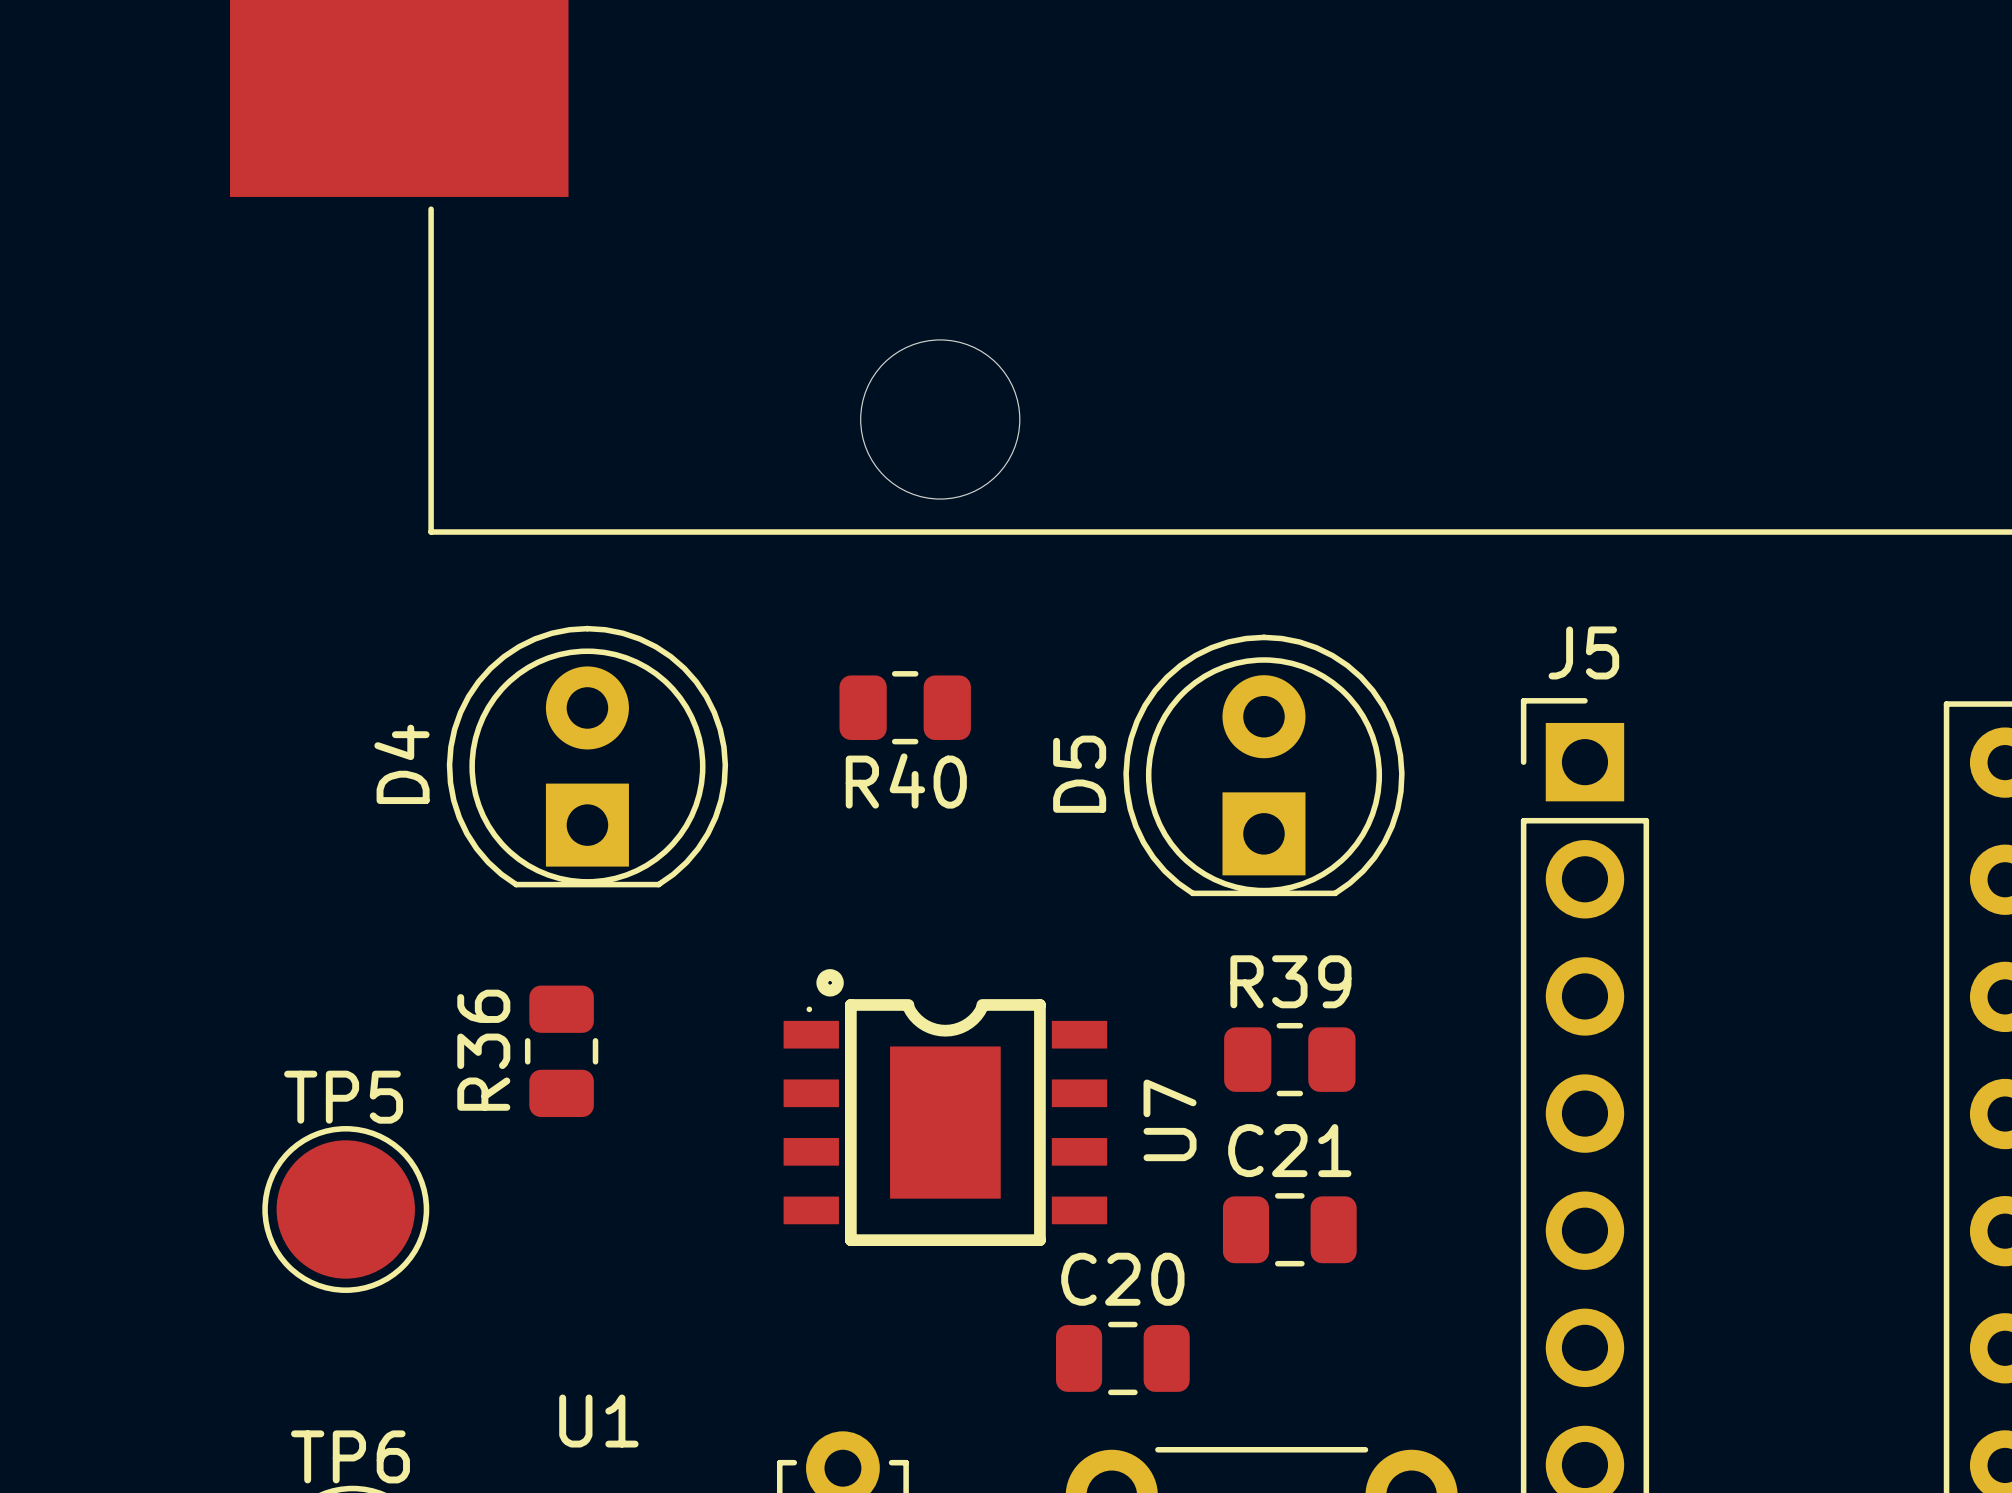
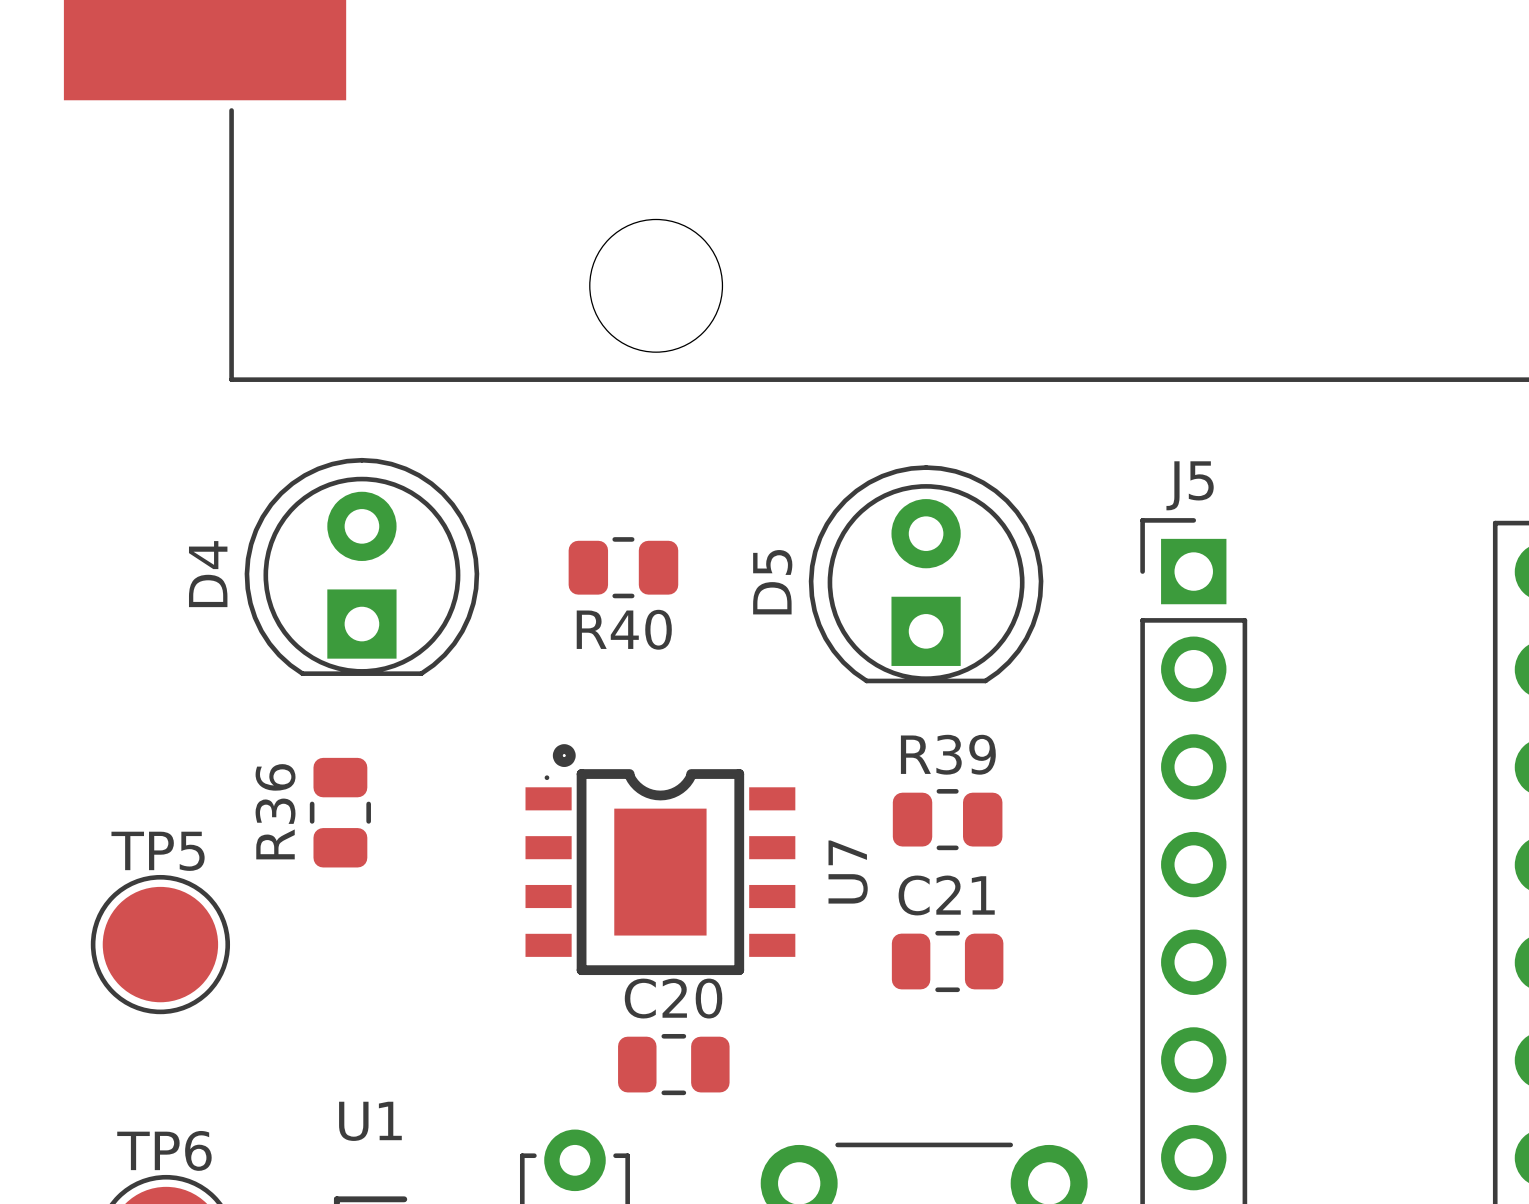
R40 position: (905, 707) -> (623, 567)
C20 position: (1122, 1358) -> (673, 1064)

